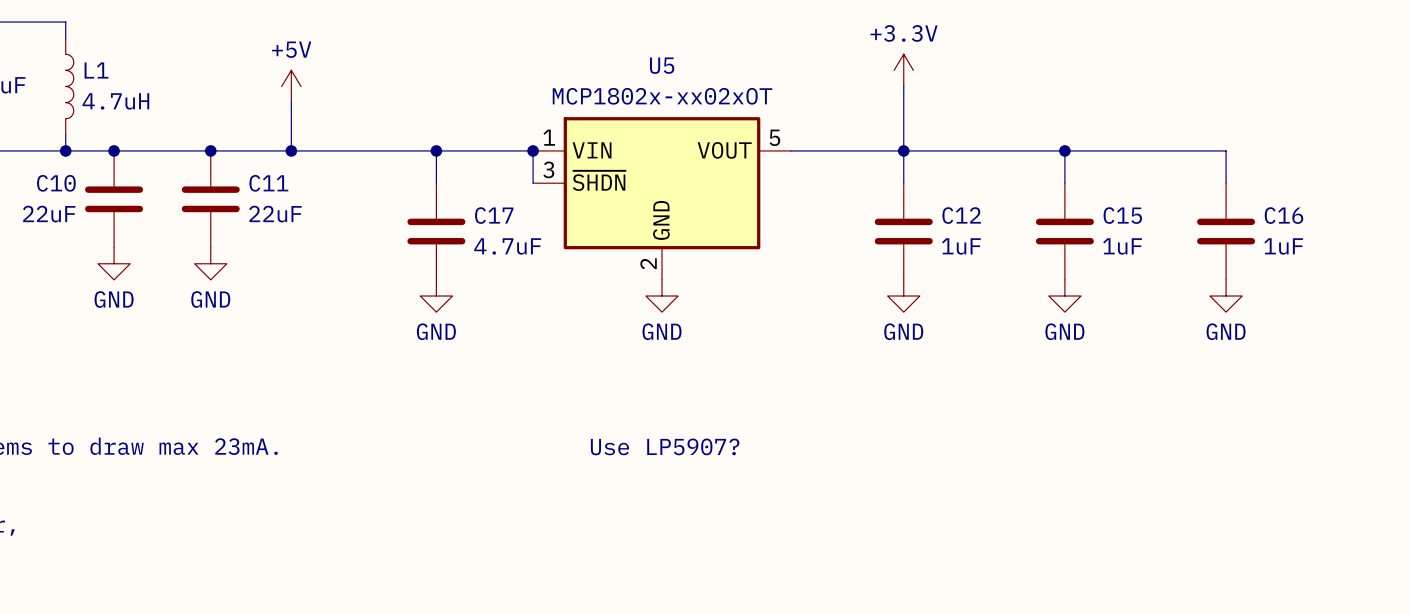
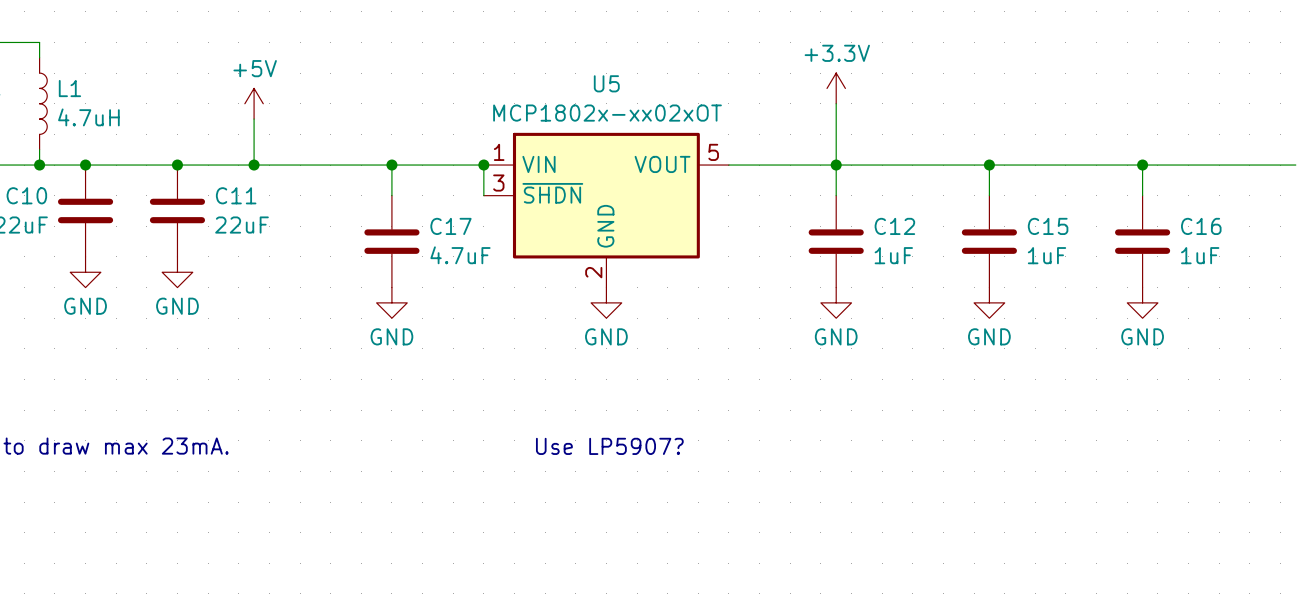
wire: none -> (1142, 165) (1295, 165)
junction: none -> (1142, 165)

